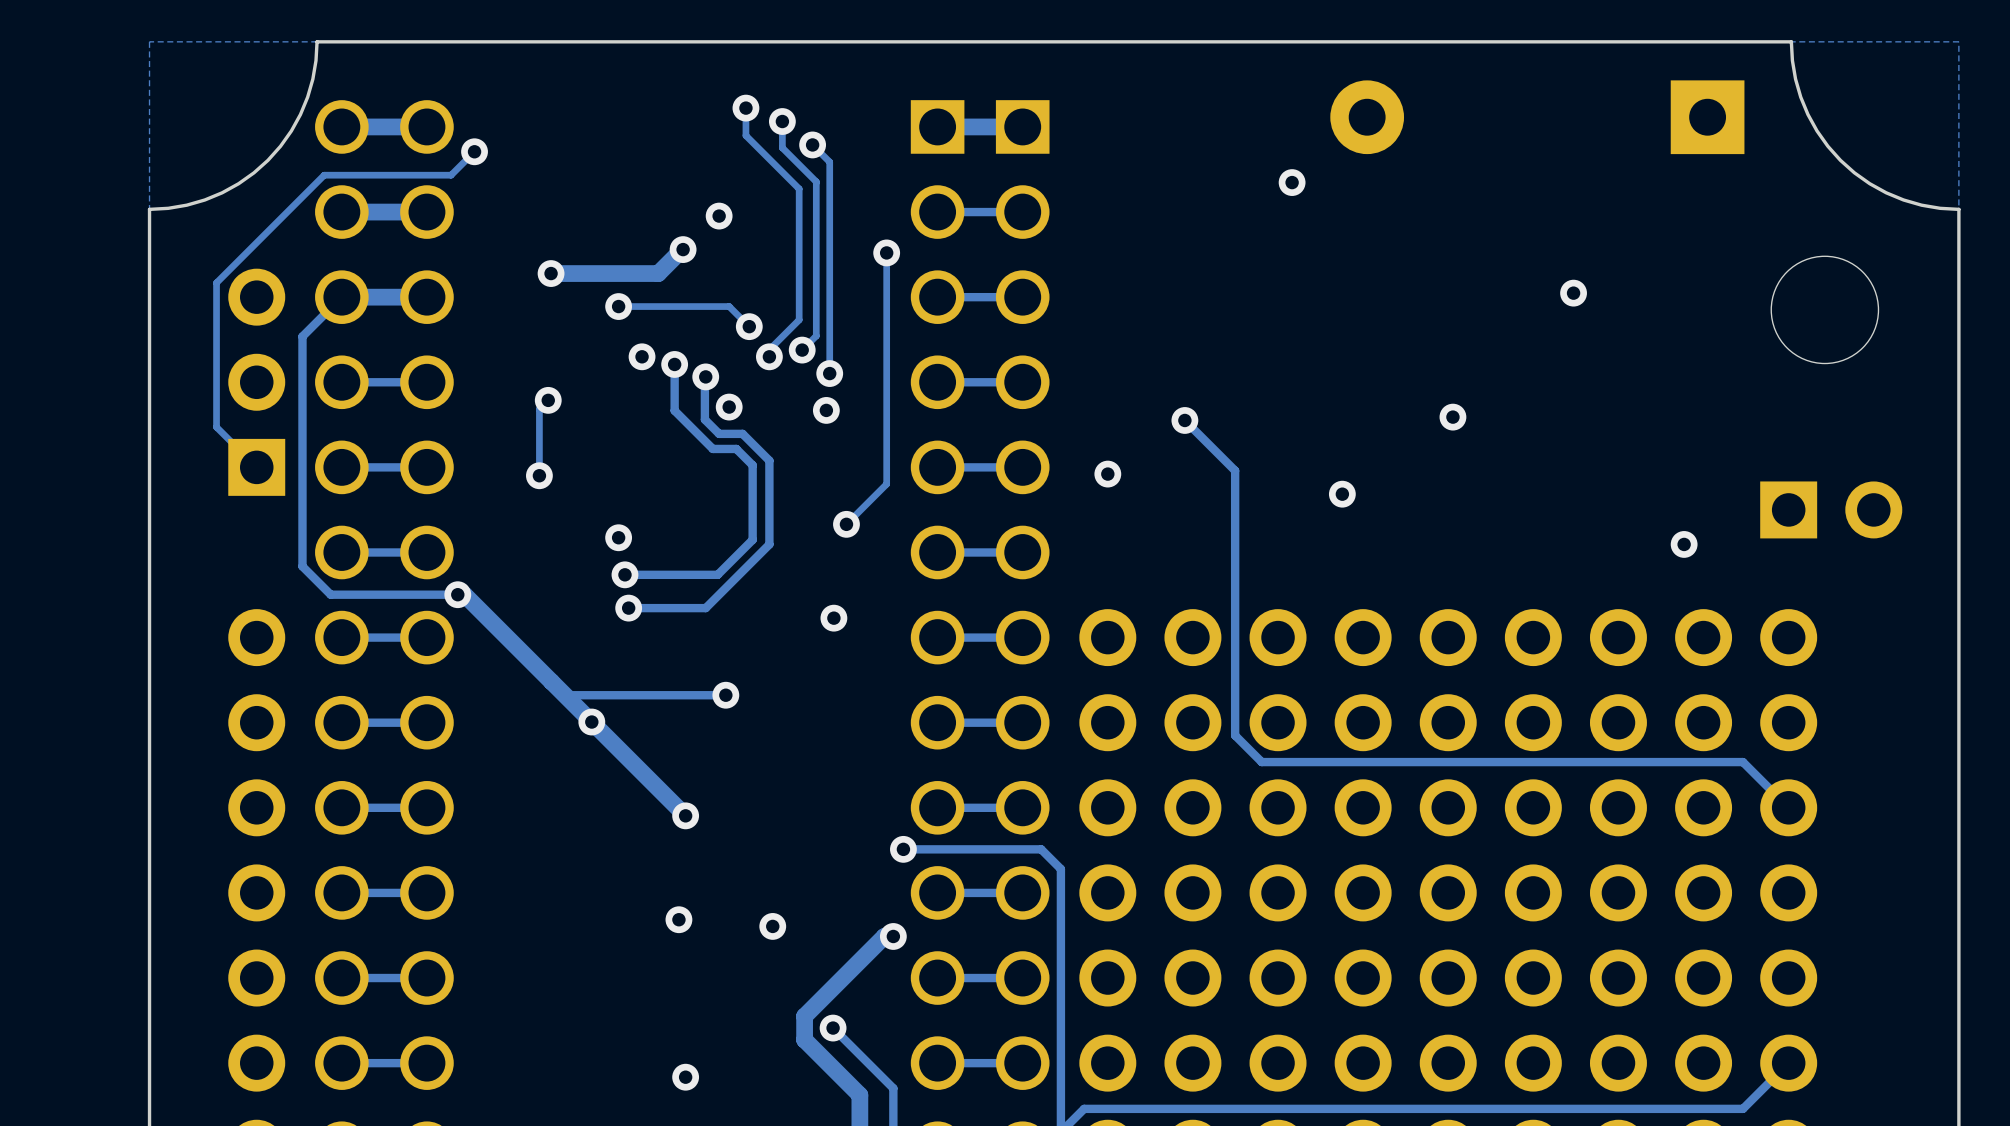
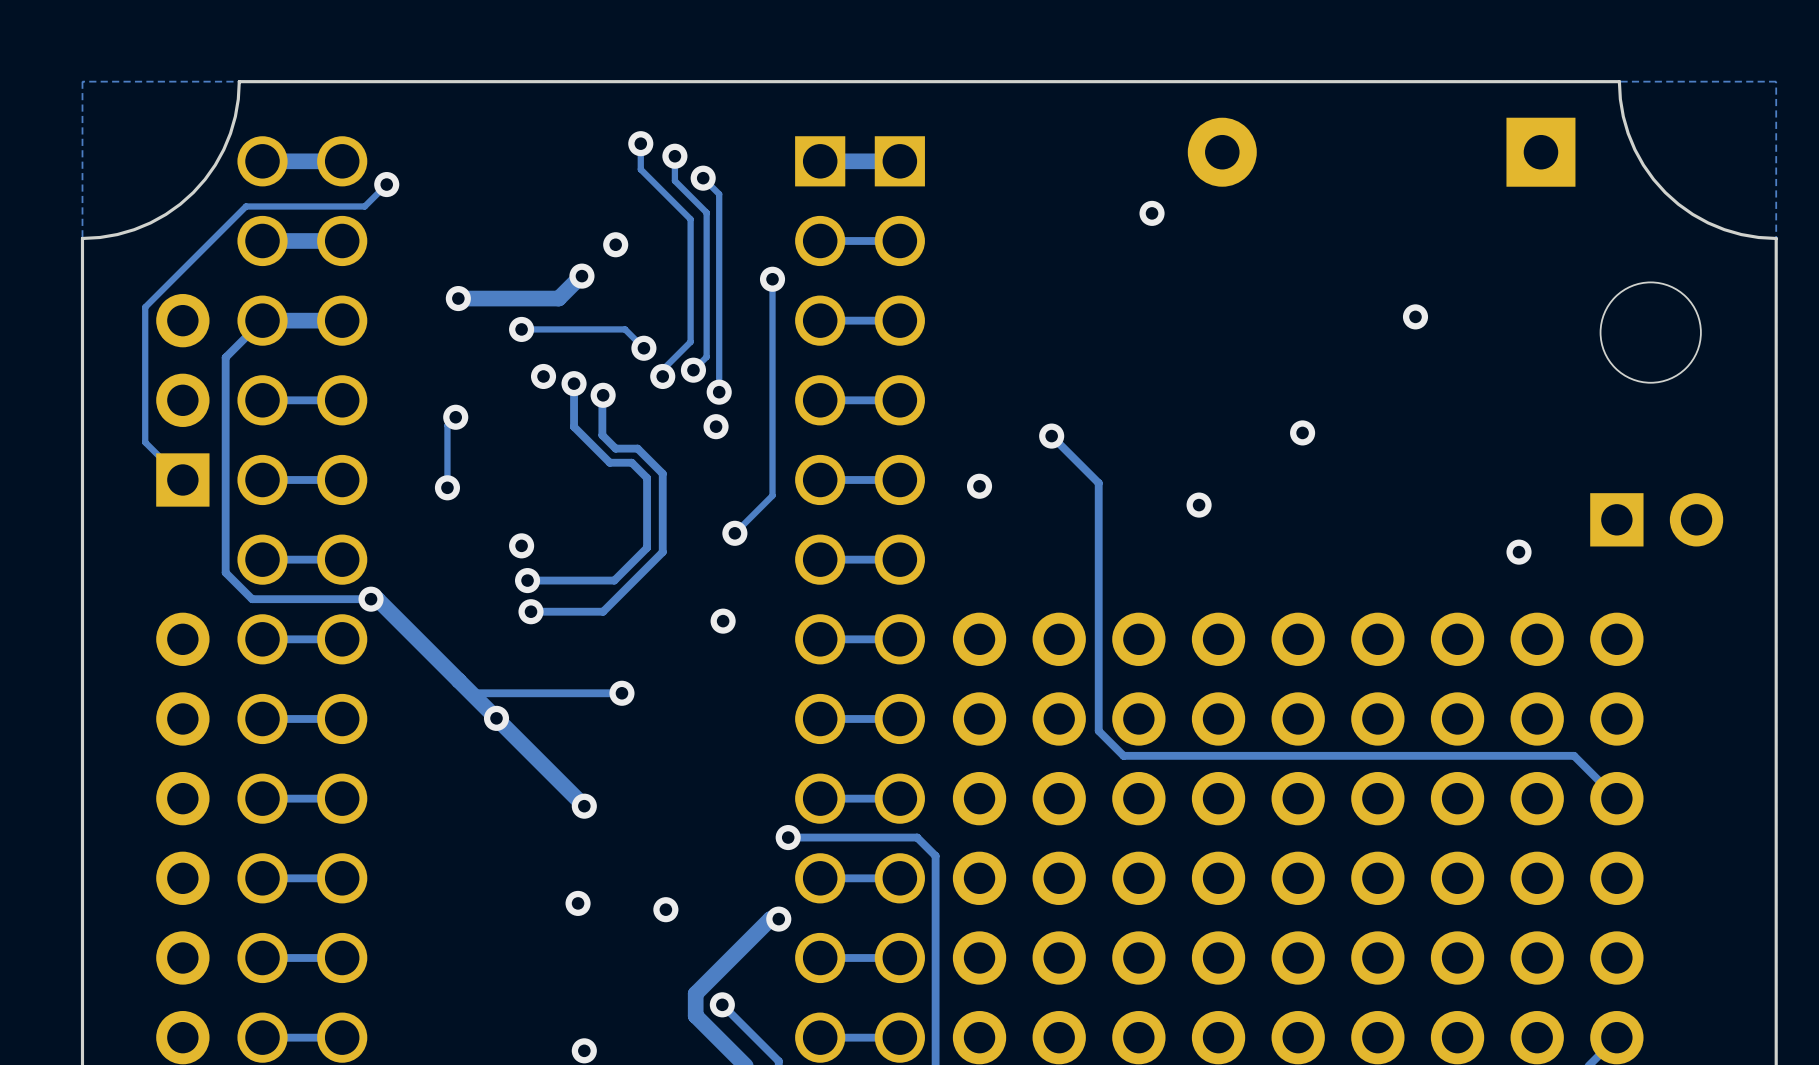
via: (729, 407) -> none

